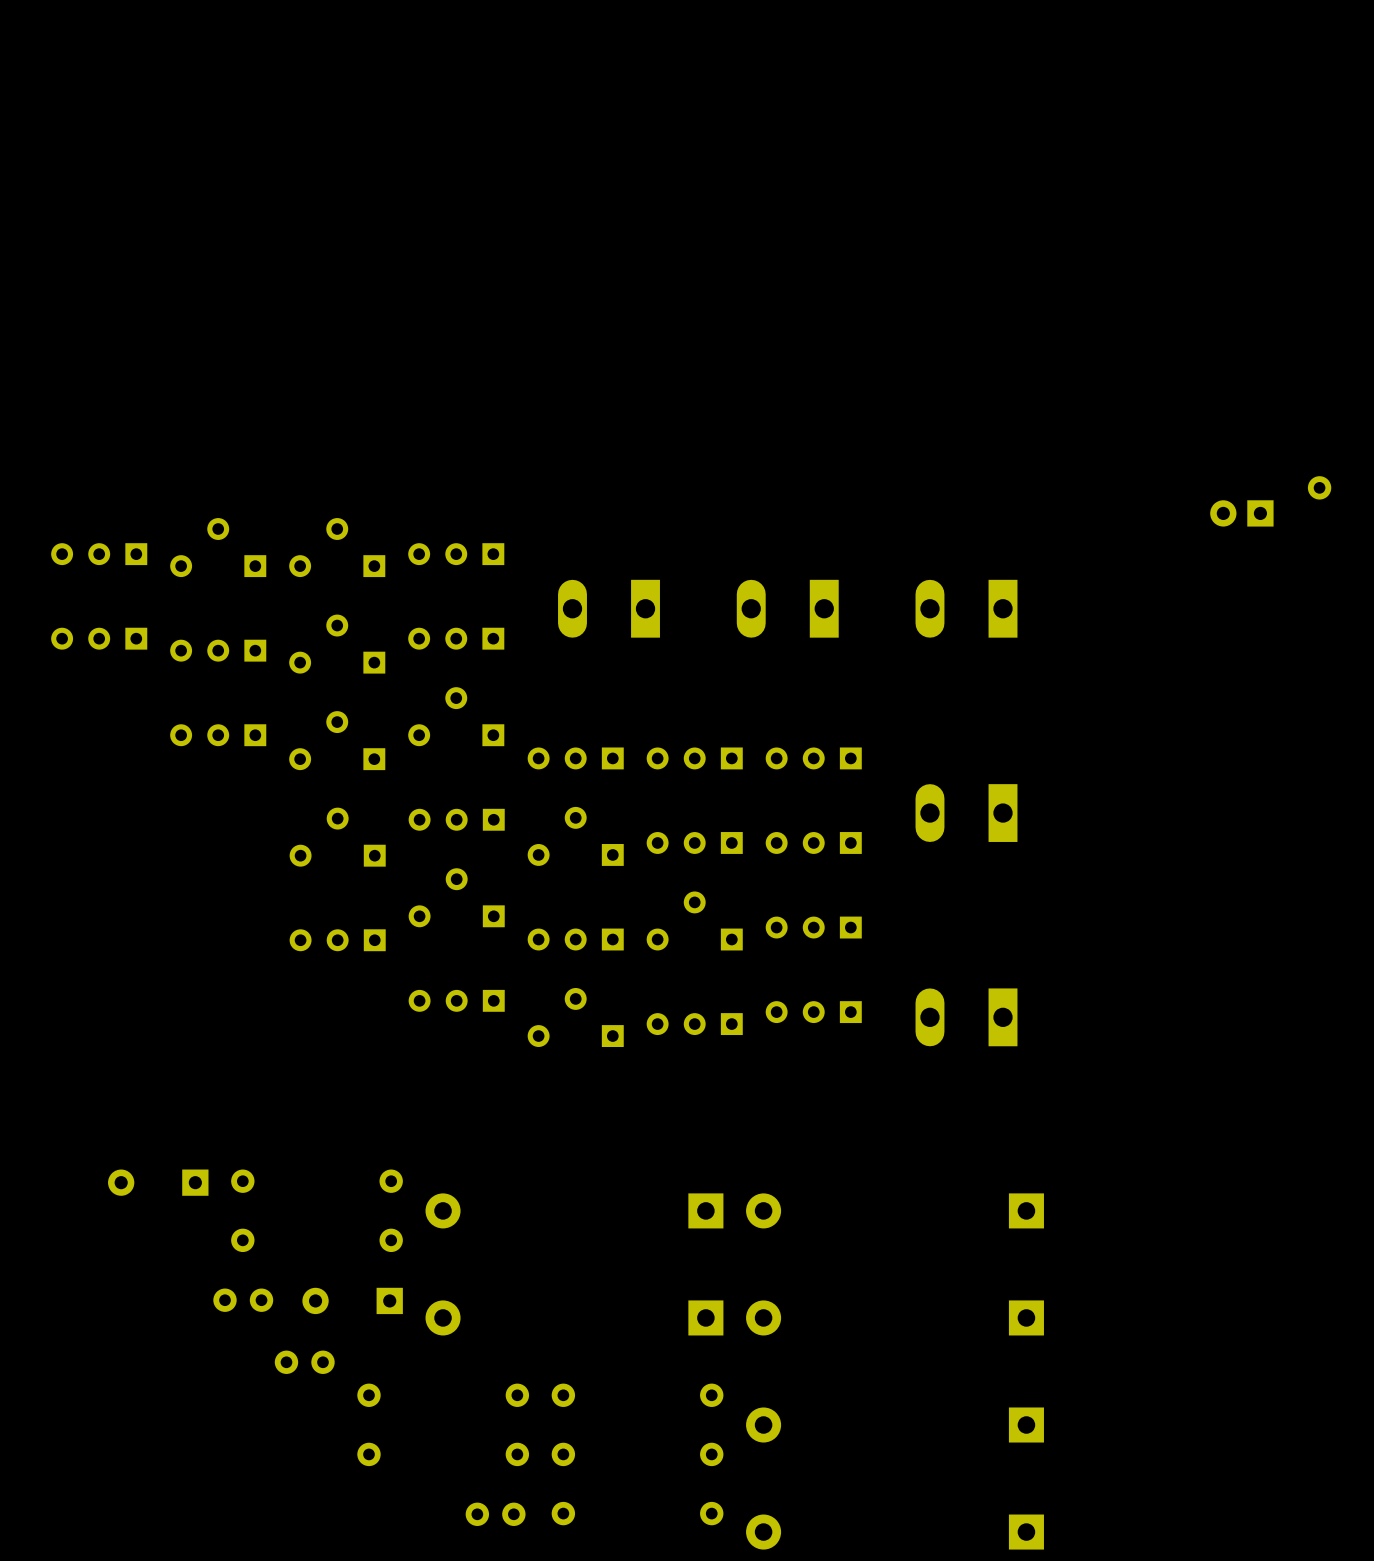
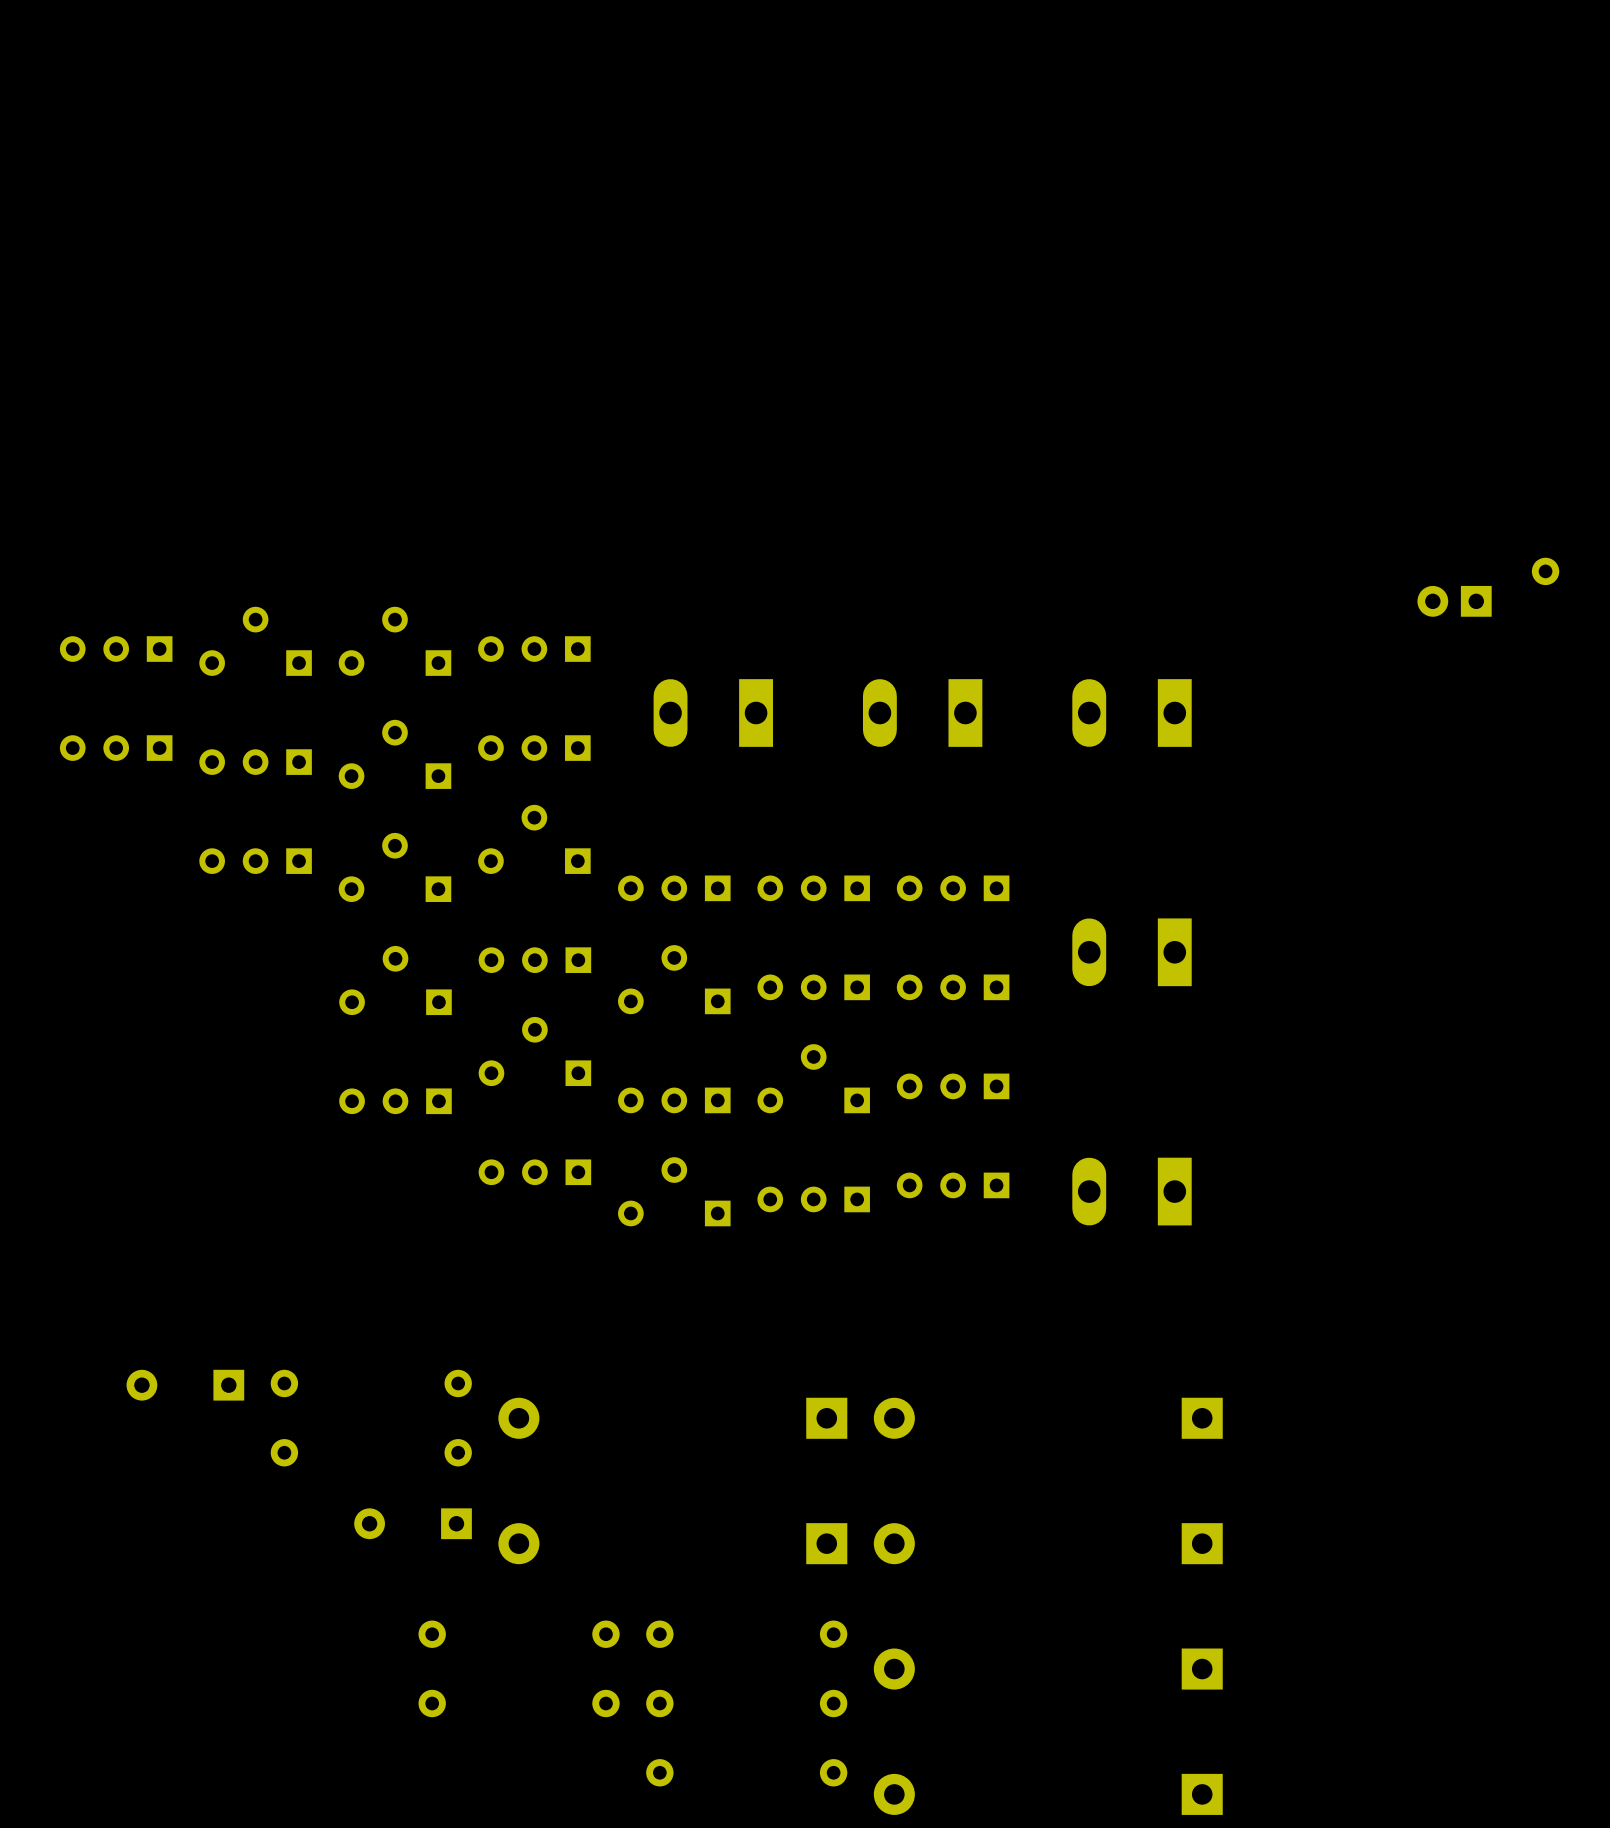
part: (243, 1300) -> none
part: (304, 1362) -> none
part: (495, 1514) -> none

